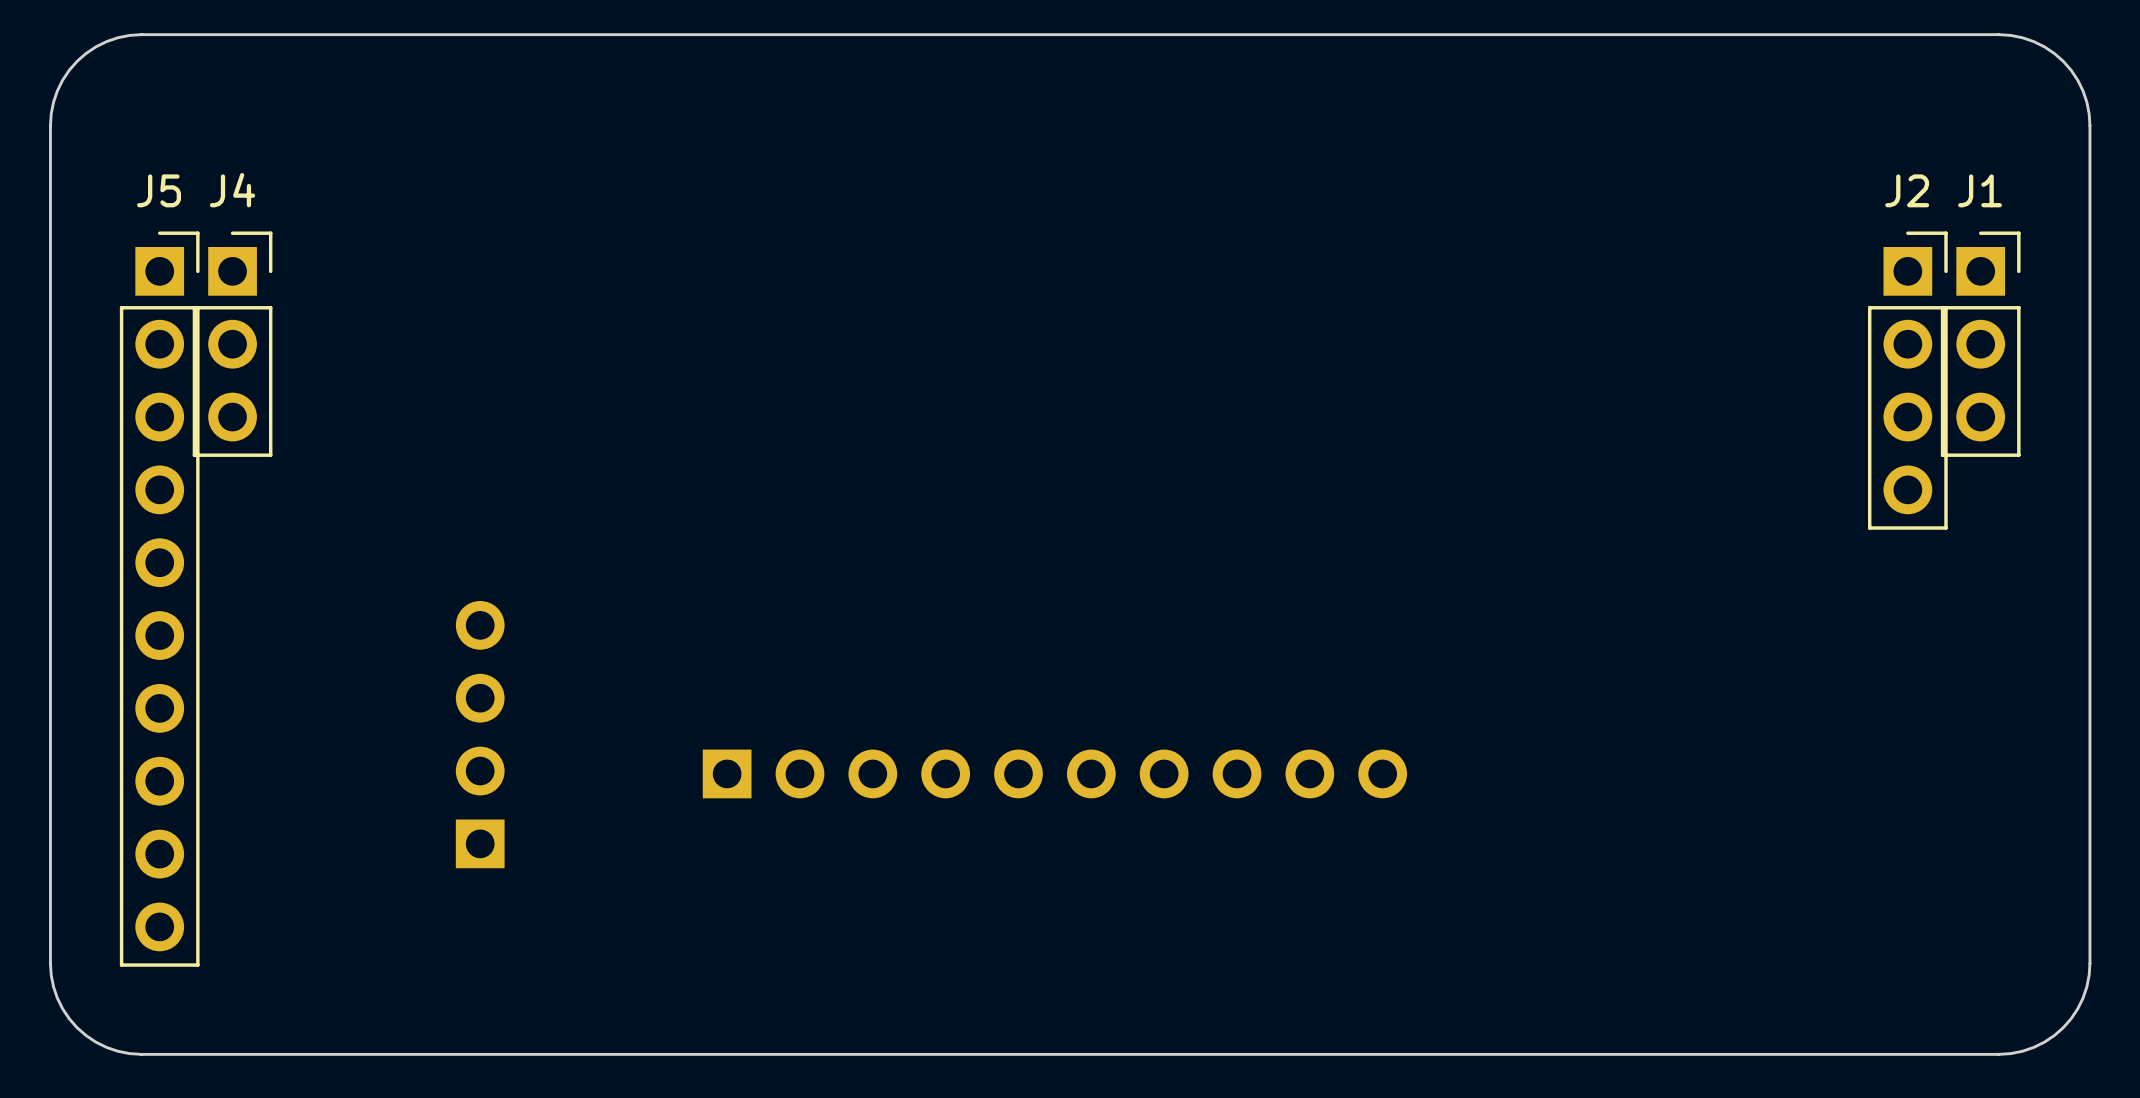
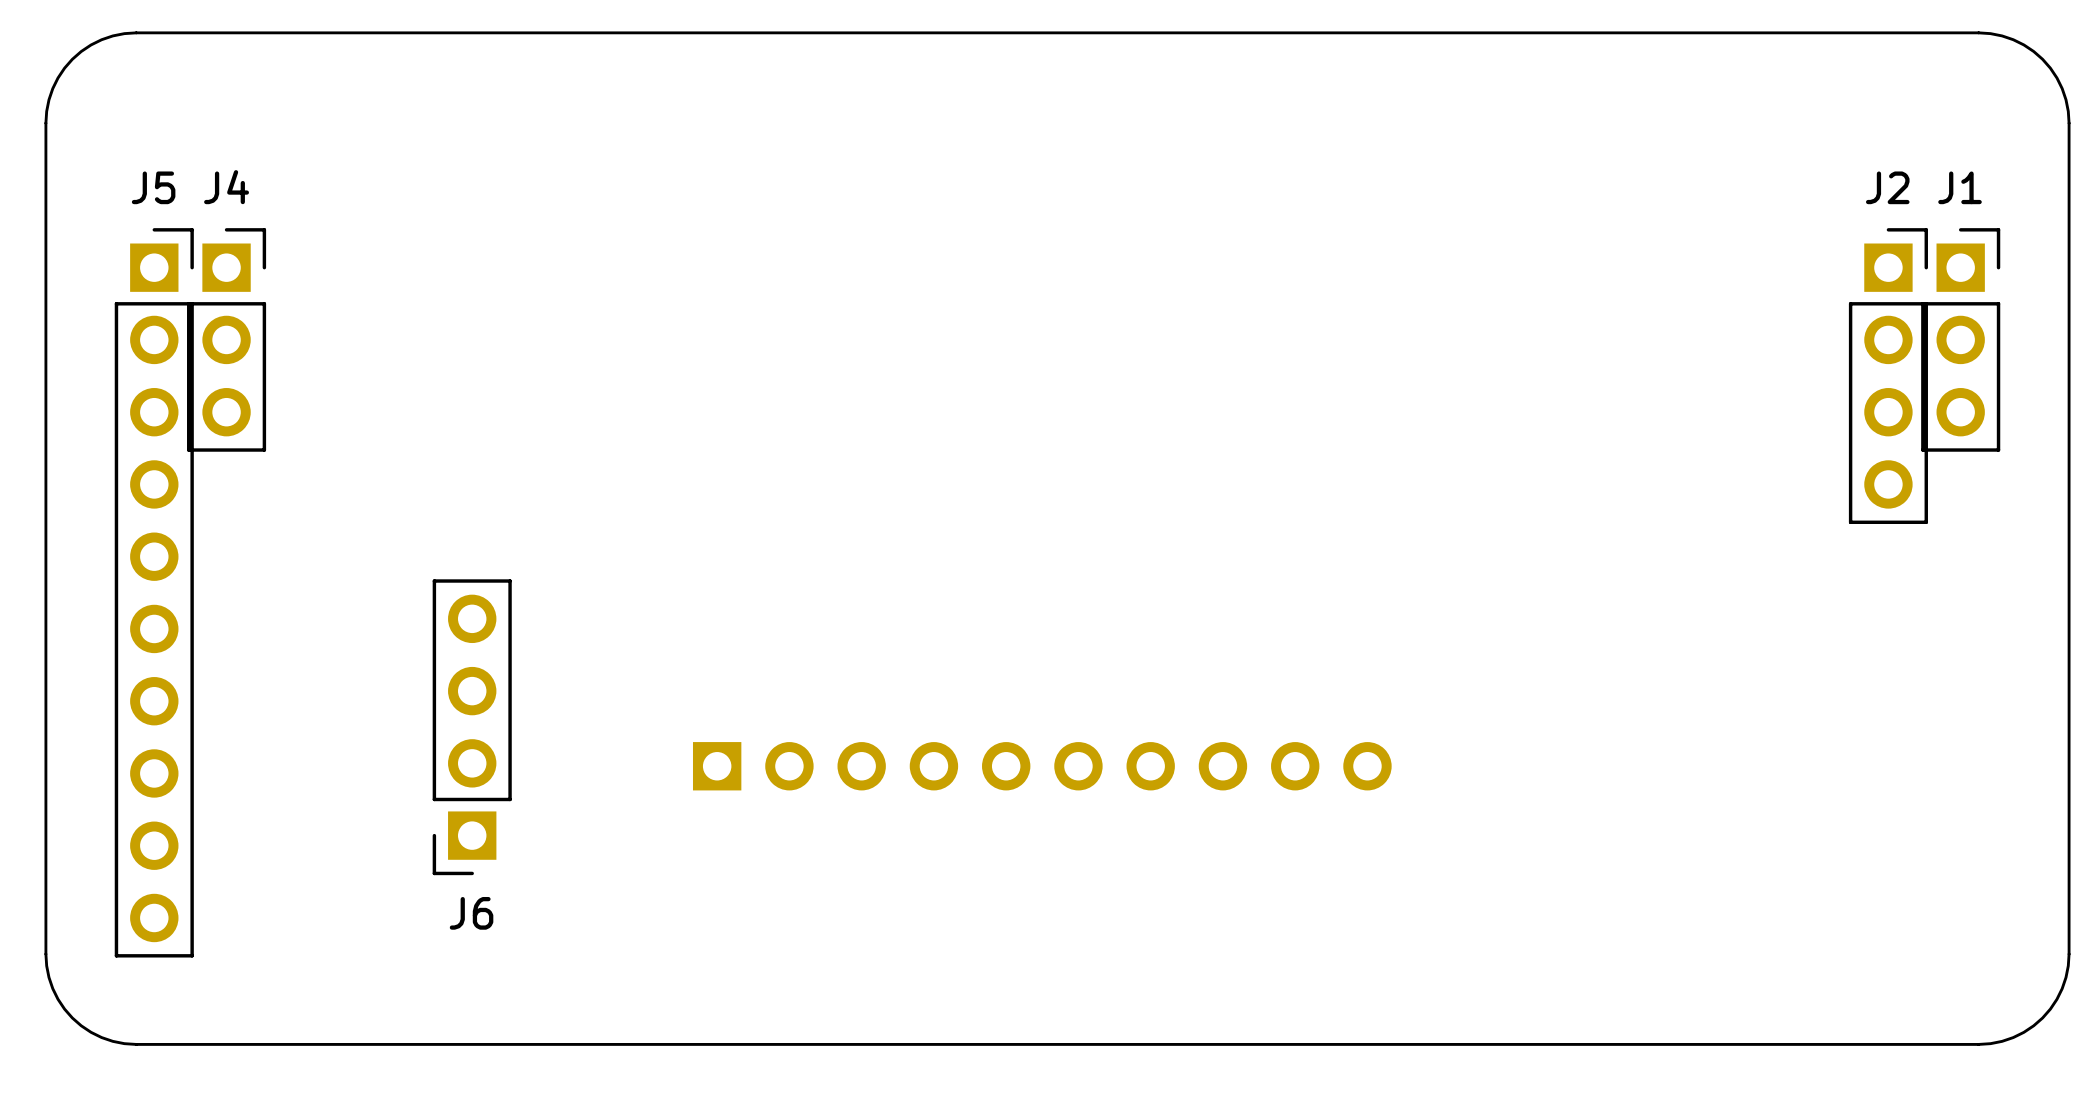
J6 side: top (480, 734) -> bottom (472, 727)

